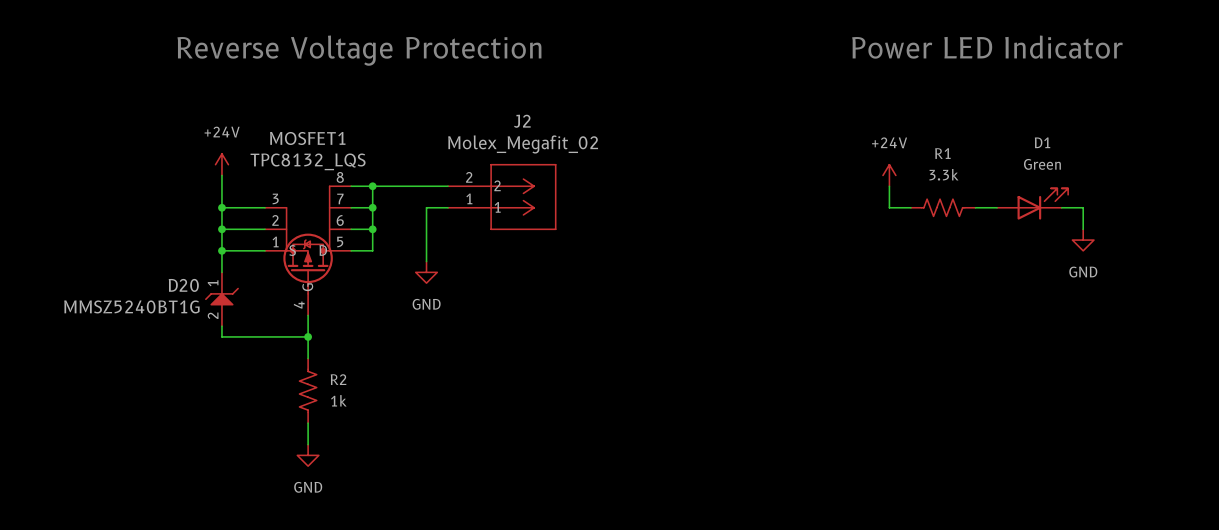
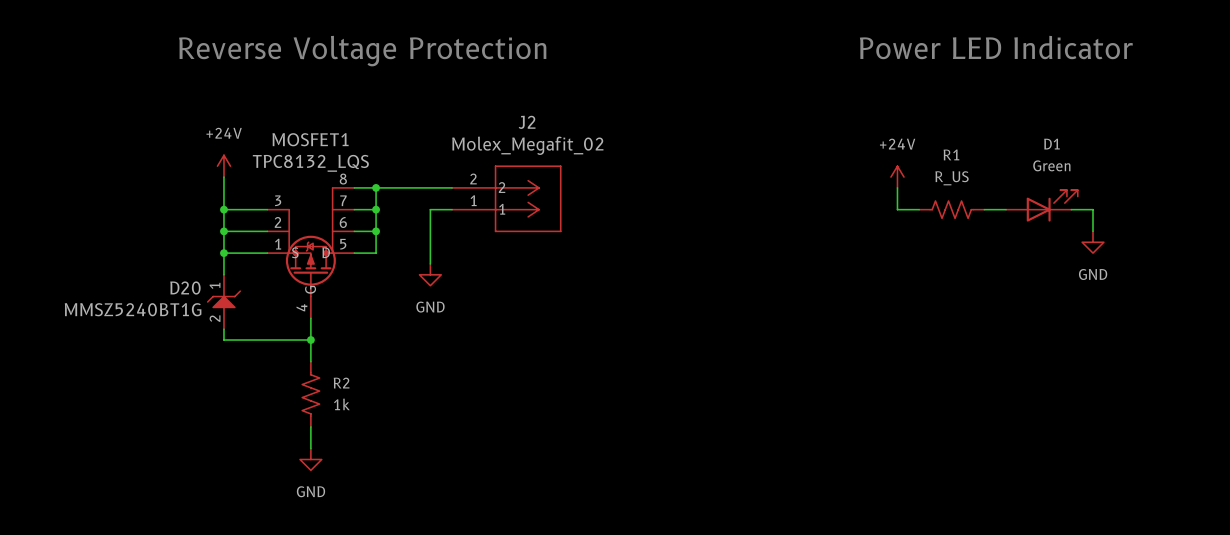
R1 value: 3.3k (943, 174) -> R_US (952, 178)

